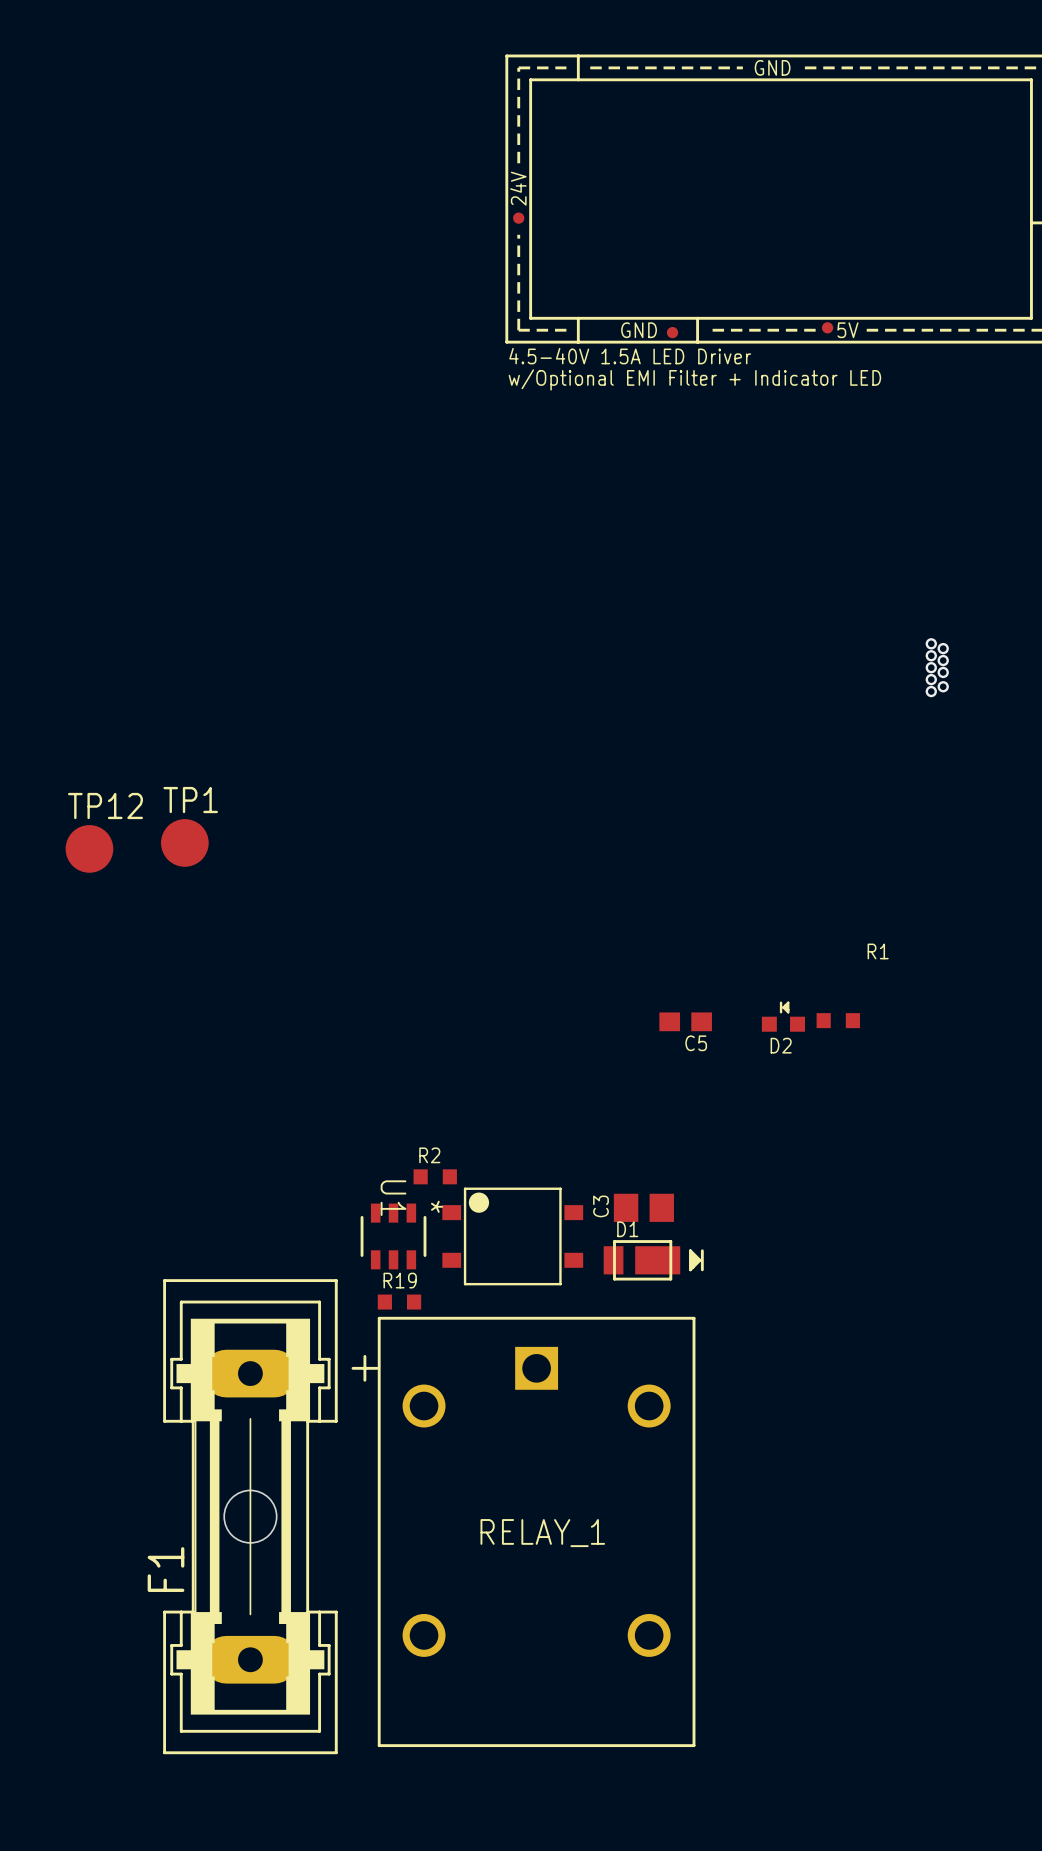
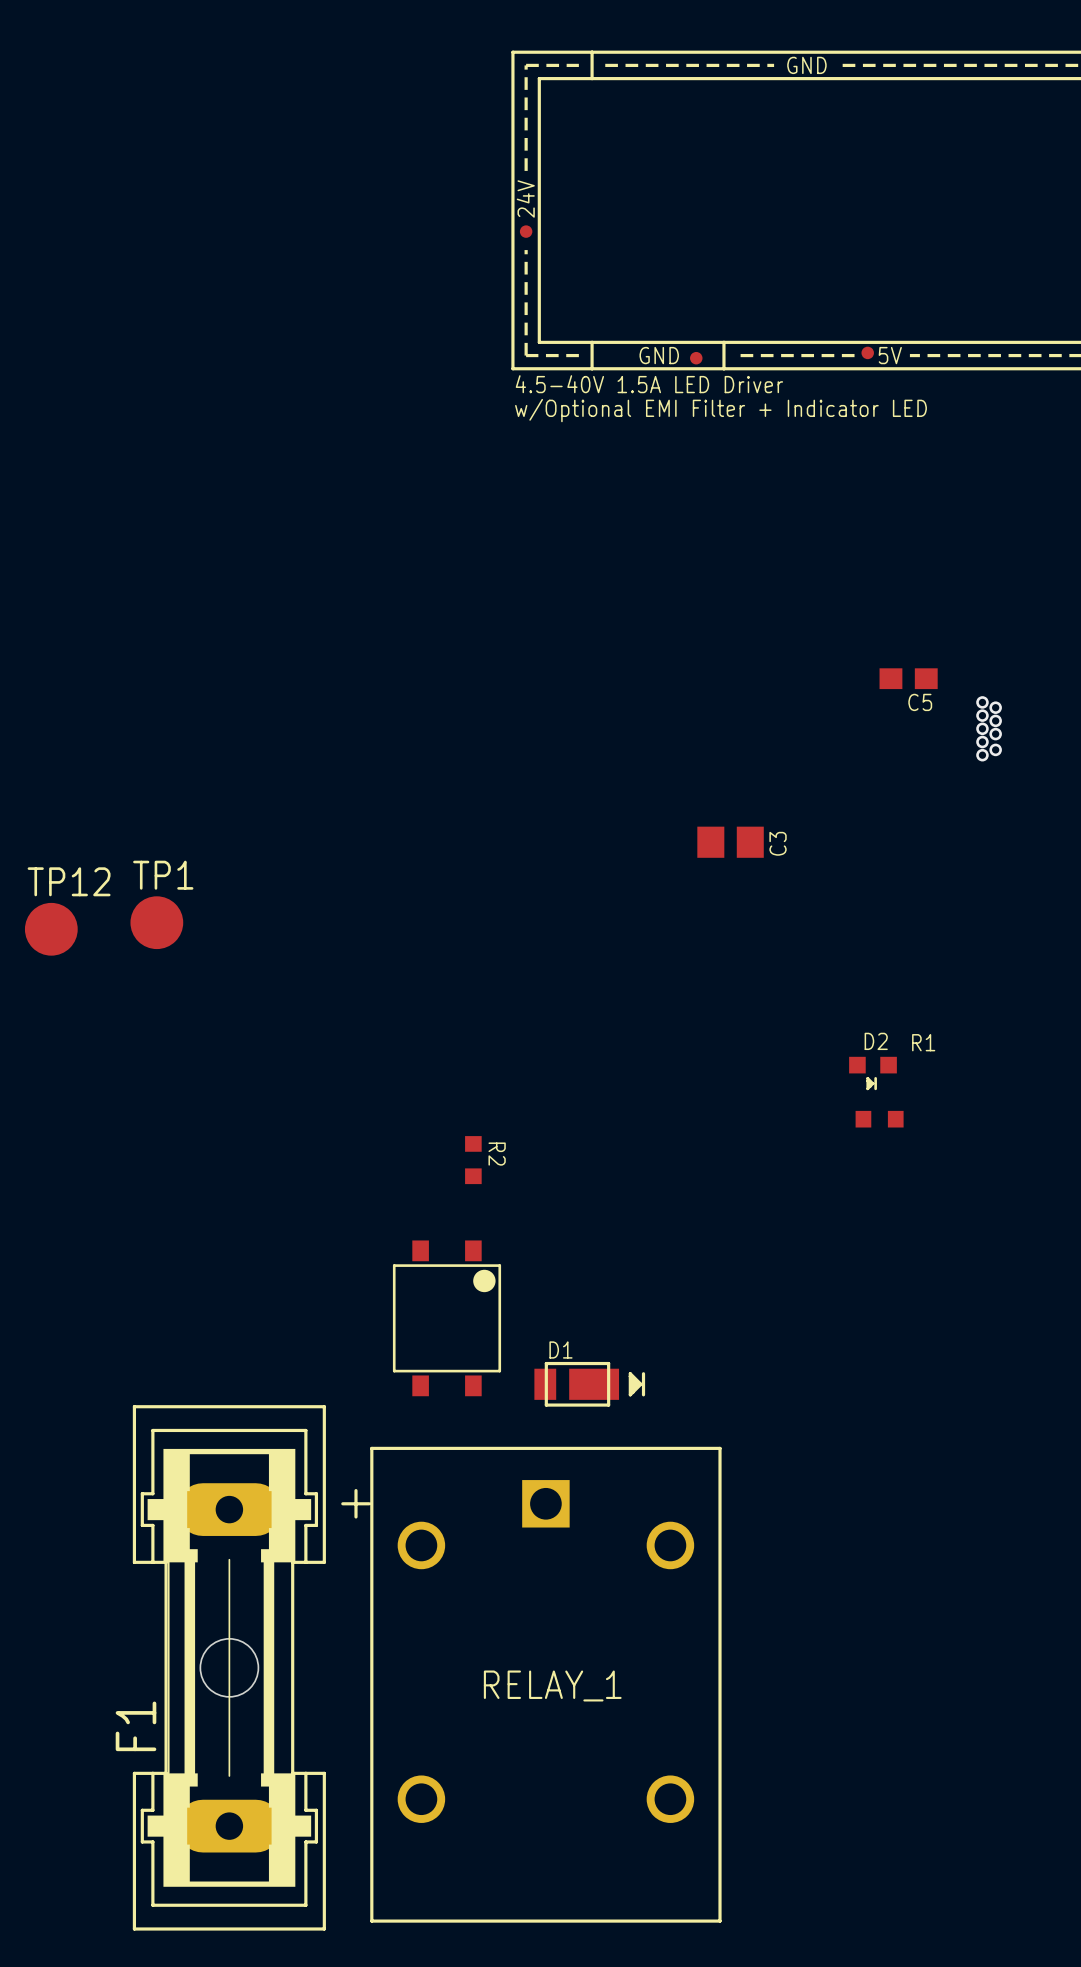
D2 rotation: 0° (783, 1016) -> 180° (873, 1073)
D2 position: (783, 1016) -> (873, 1073)
C5 position: (685, 1021) -> (908, 678)
R2 rotation: 0° (435, 1176) -> 90° clockwise (473, 1160)
R2 position: (435, 1176) -> (473, 1160)
C3 name position: C3 (601, 1206) -> C3 (778, 843)
C3 position: (643, 1207) -> (730, 842)
U1: (393, 1236) -> none
part rotation: 0° (512, 1236) -> 90° clockwise (447, 1318)
D1 position: (653, 1260) -> (589, 1384)
R19: (399, 1302) -> none

